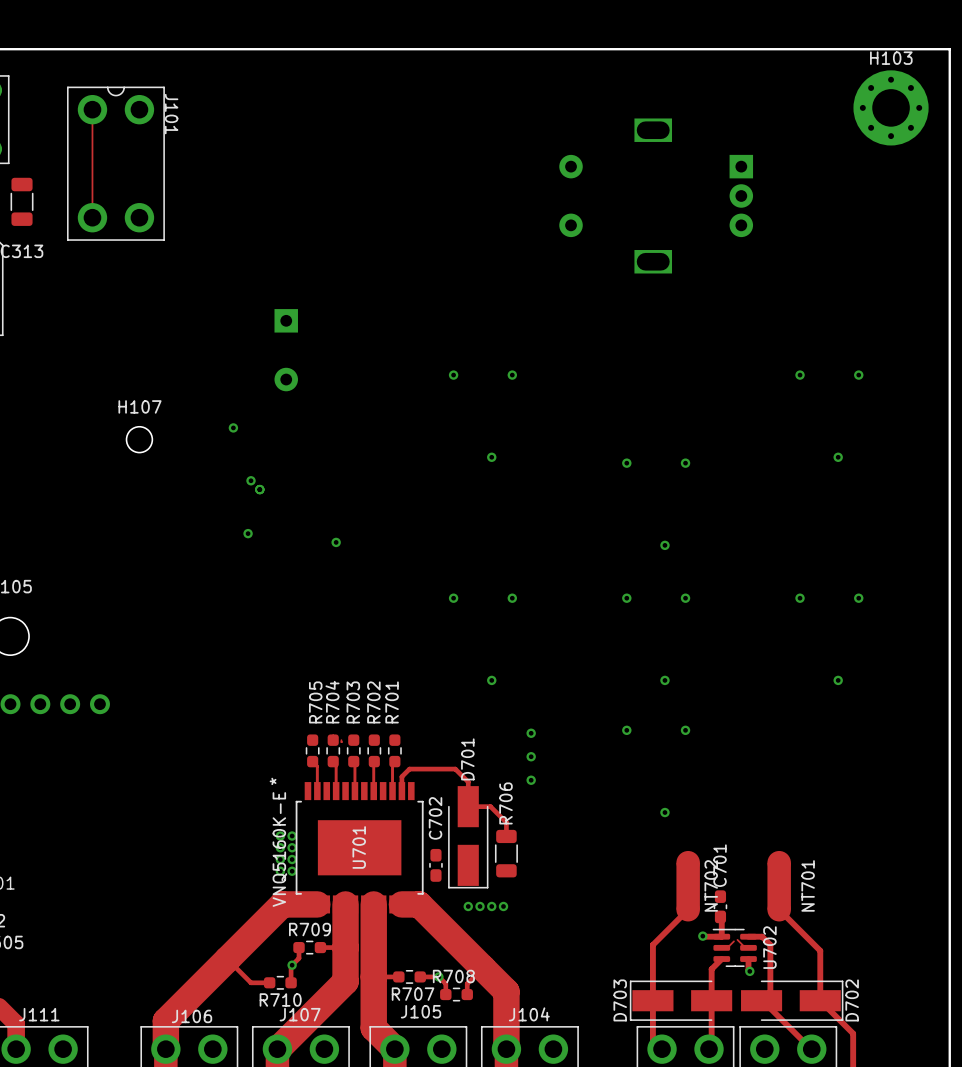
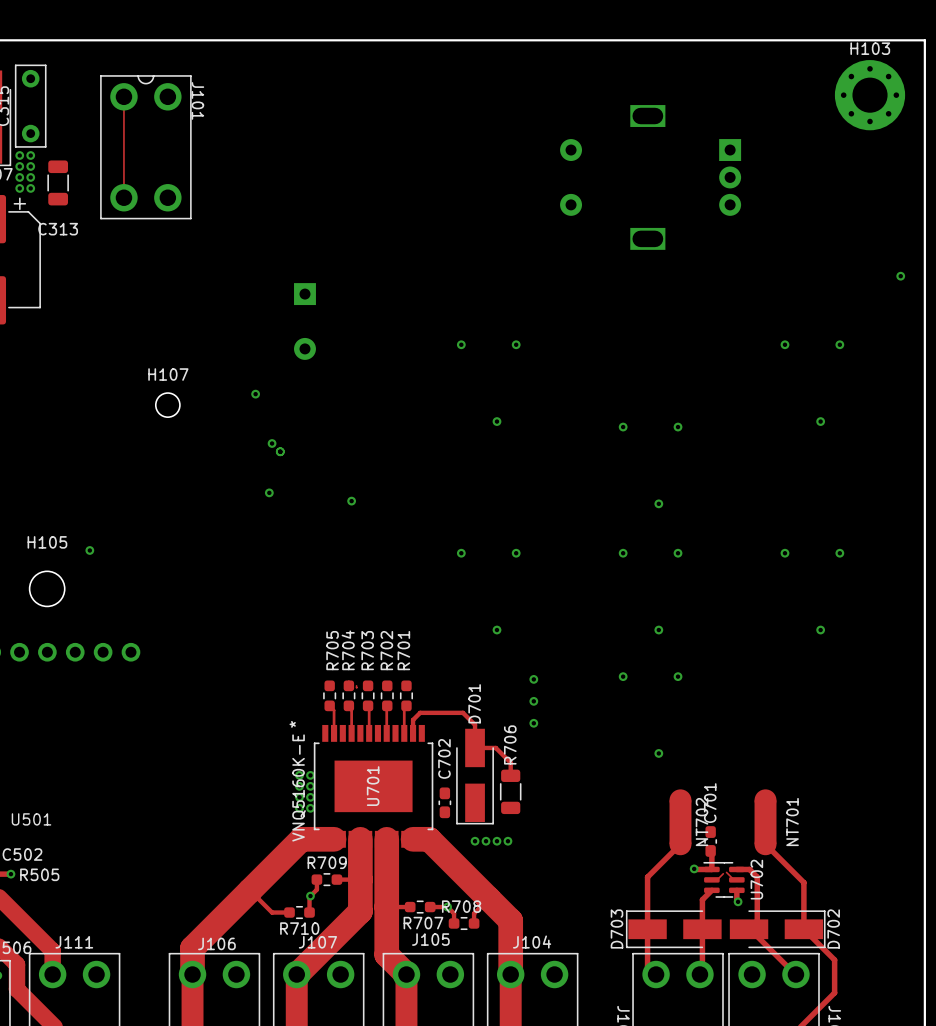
via: none -> (900, 276)
via: none -> (89, 550)

